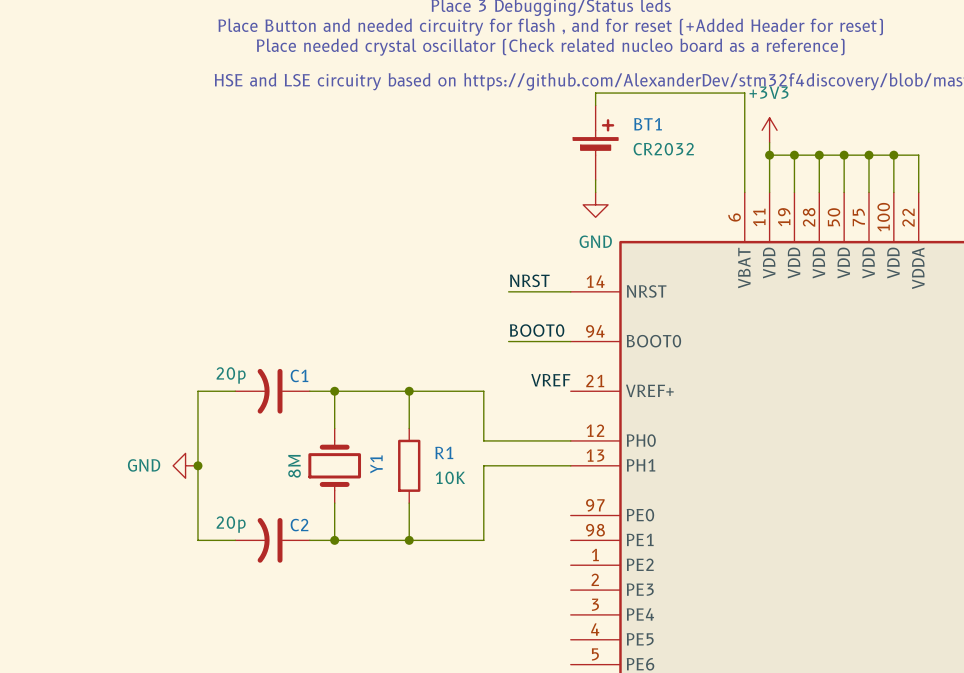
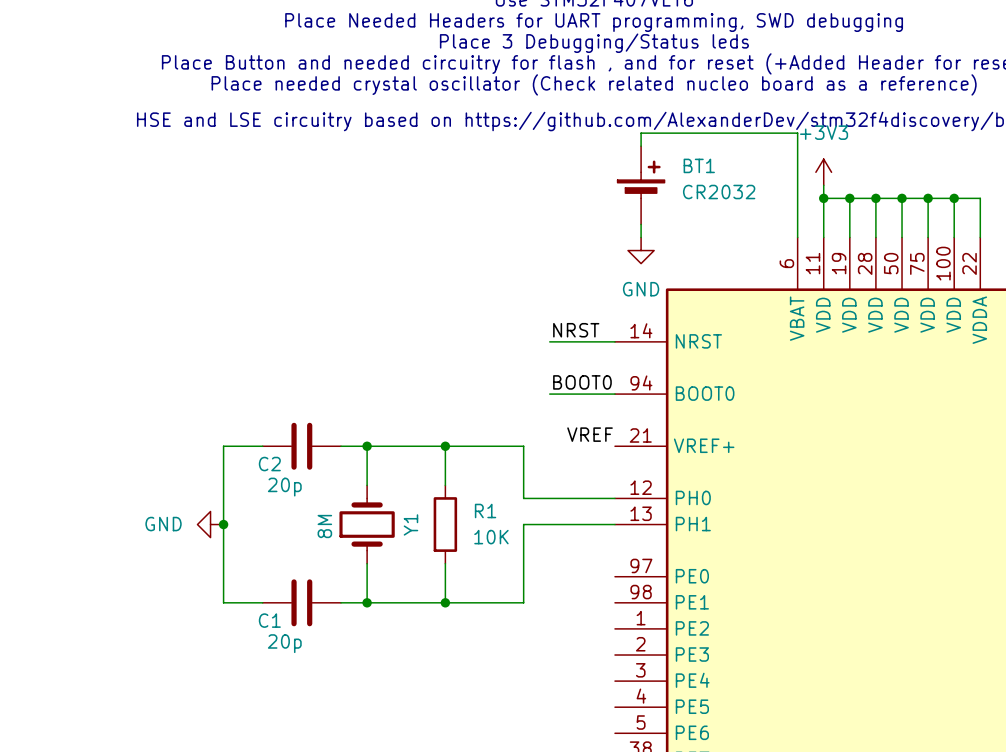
C1 symbol: [235, 368, 310, 414] -> [262, 579, 342, 627]
C1 value position: 20p (231, 375) -> 20p (284, 643)
C1 name position: C1 (299, 375) -> C1 (269, 620)
C2 symbol: [235, 518, 310, 563] -> [262, 422, 342, 470]
C2 value position: 20p (231, 524) -> 20p (284, 487)
C2 name position: C2 (299, 525) -> C2 (269, 464)

